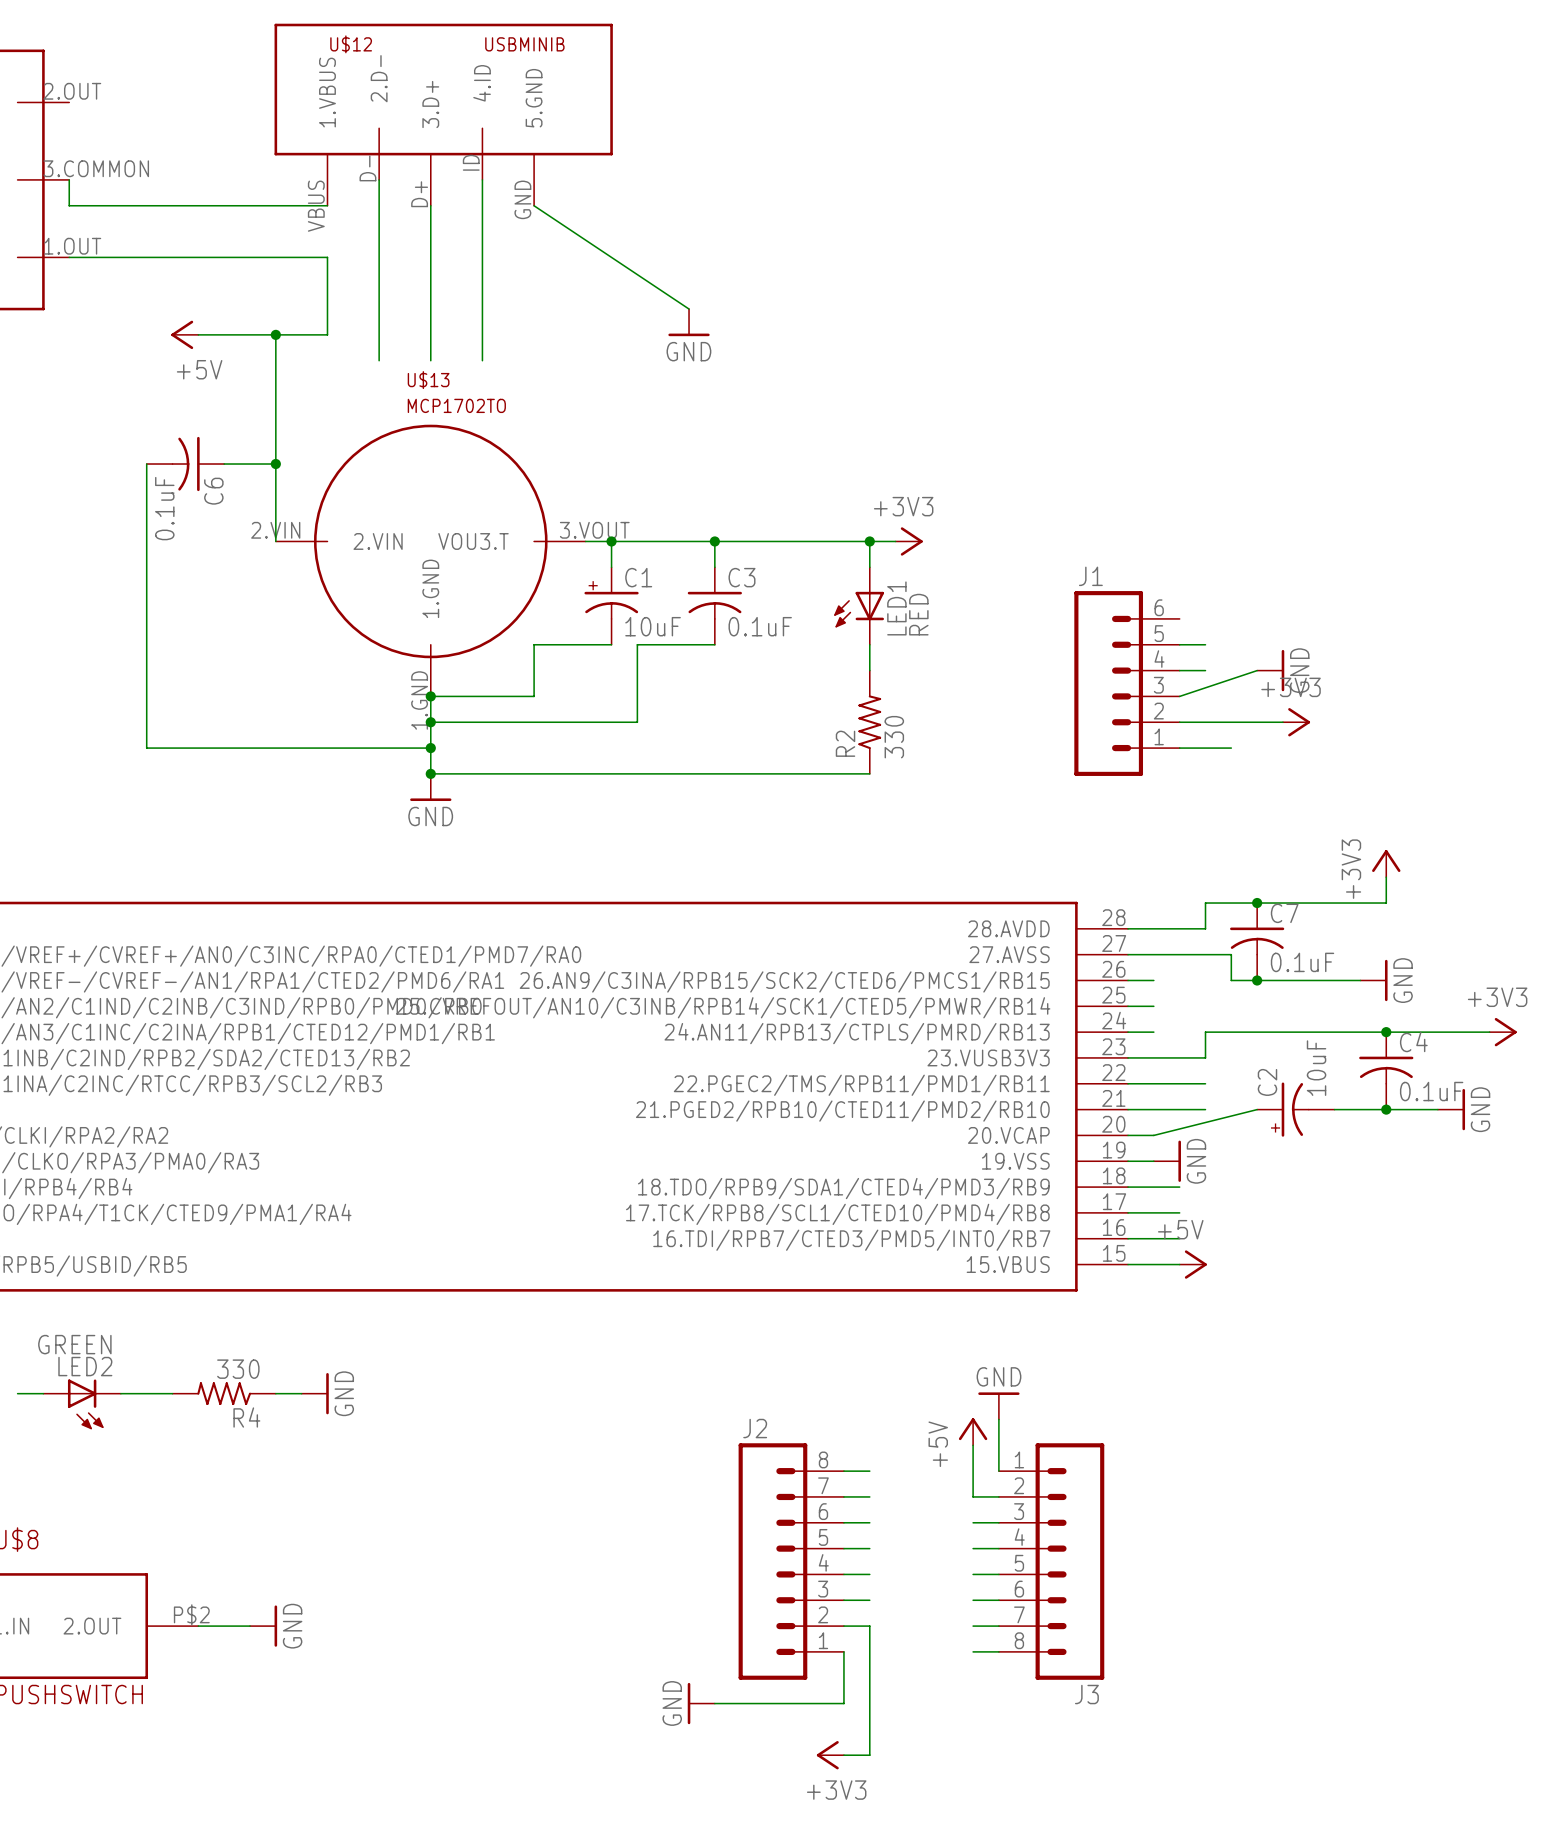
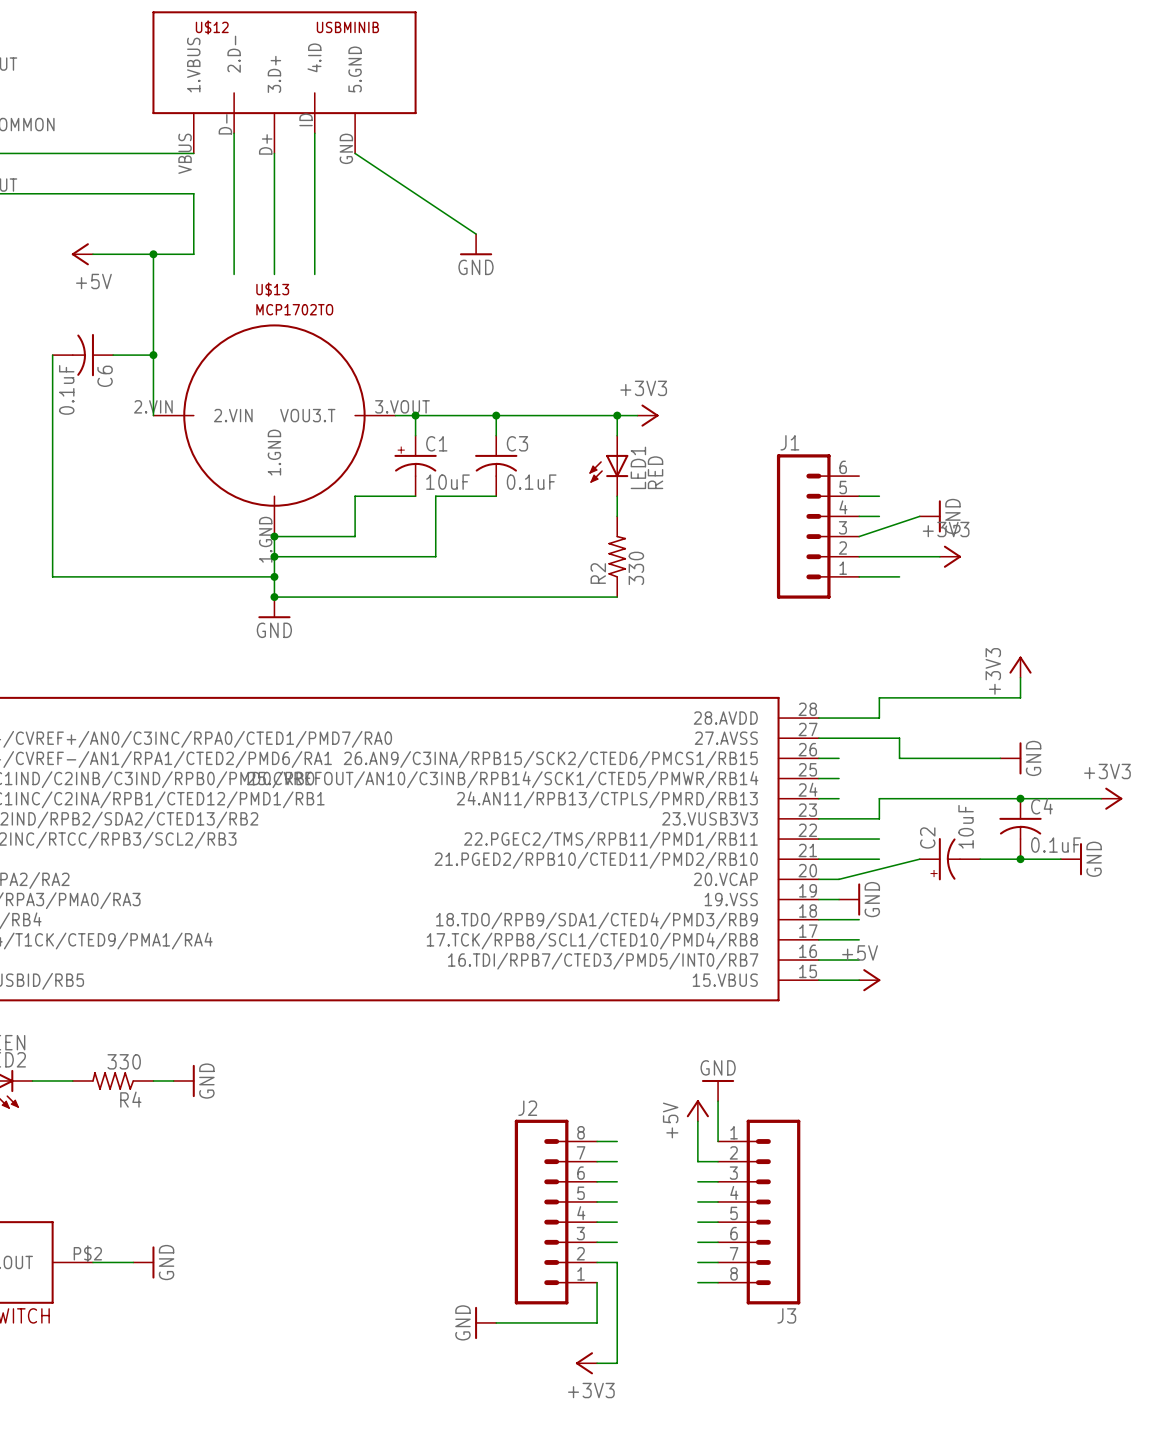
junction: (1257, 903) -> none
C7: 0.1uF (1257, 941) -> none
junction: (1257, 980) -> none

